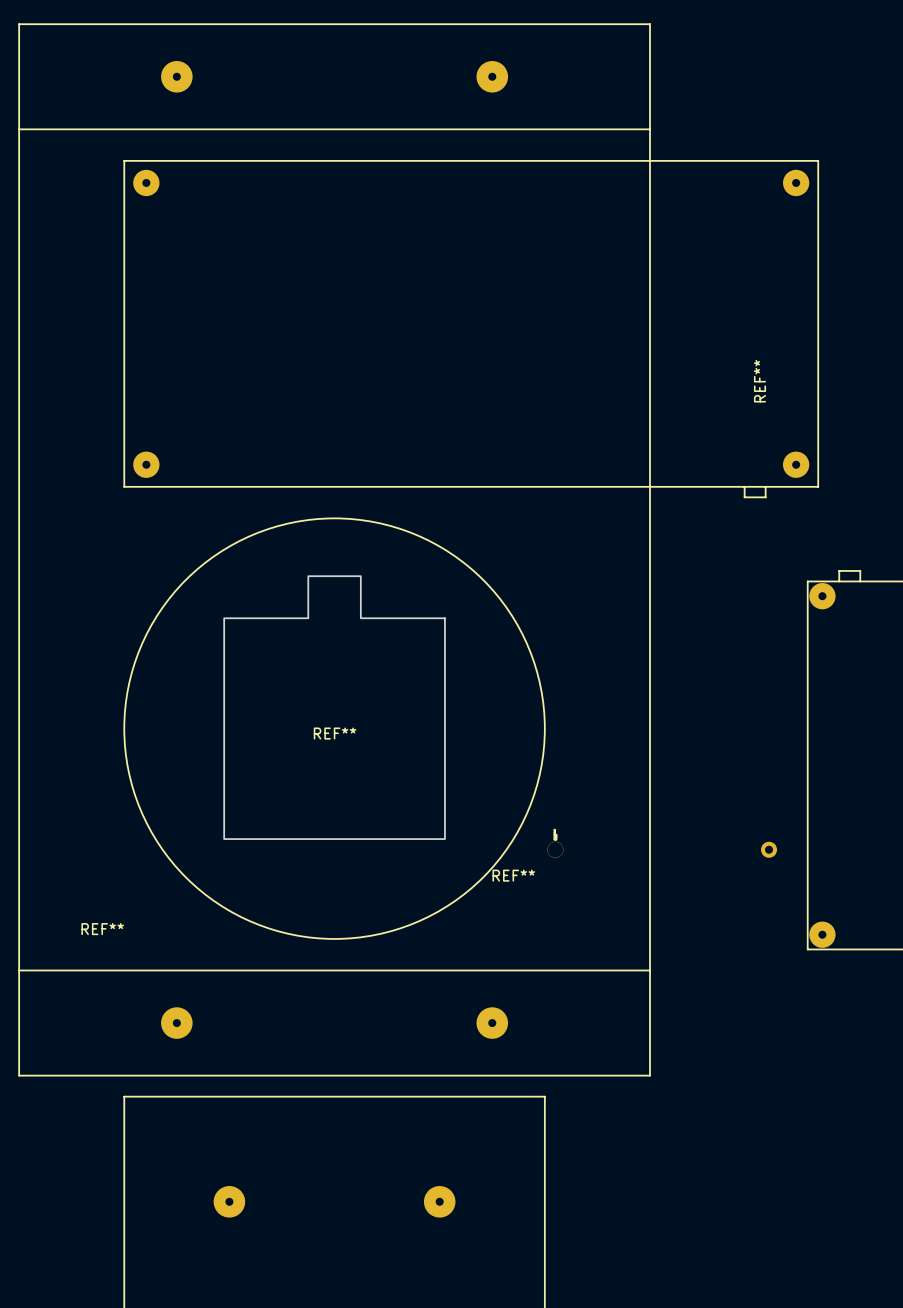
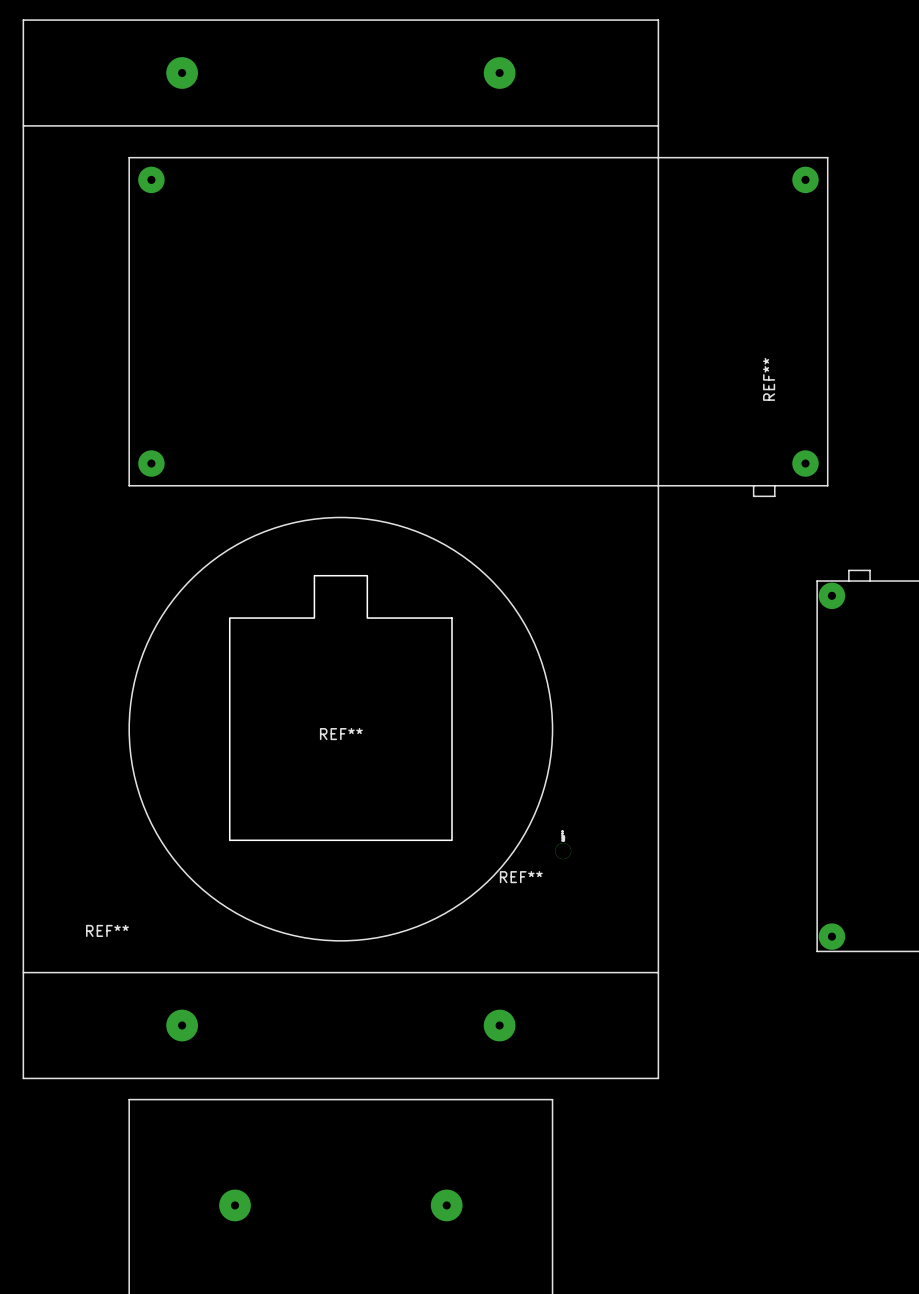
REF**: (662, 849) -> none

